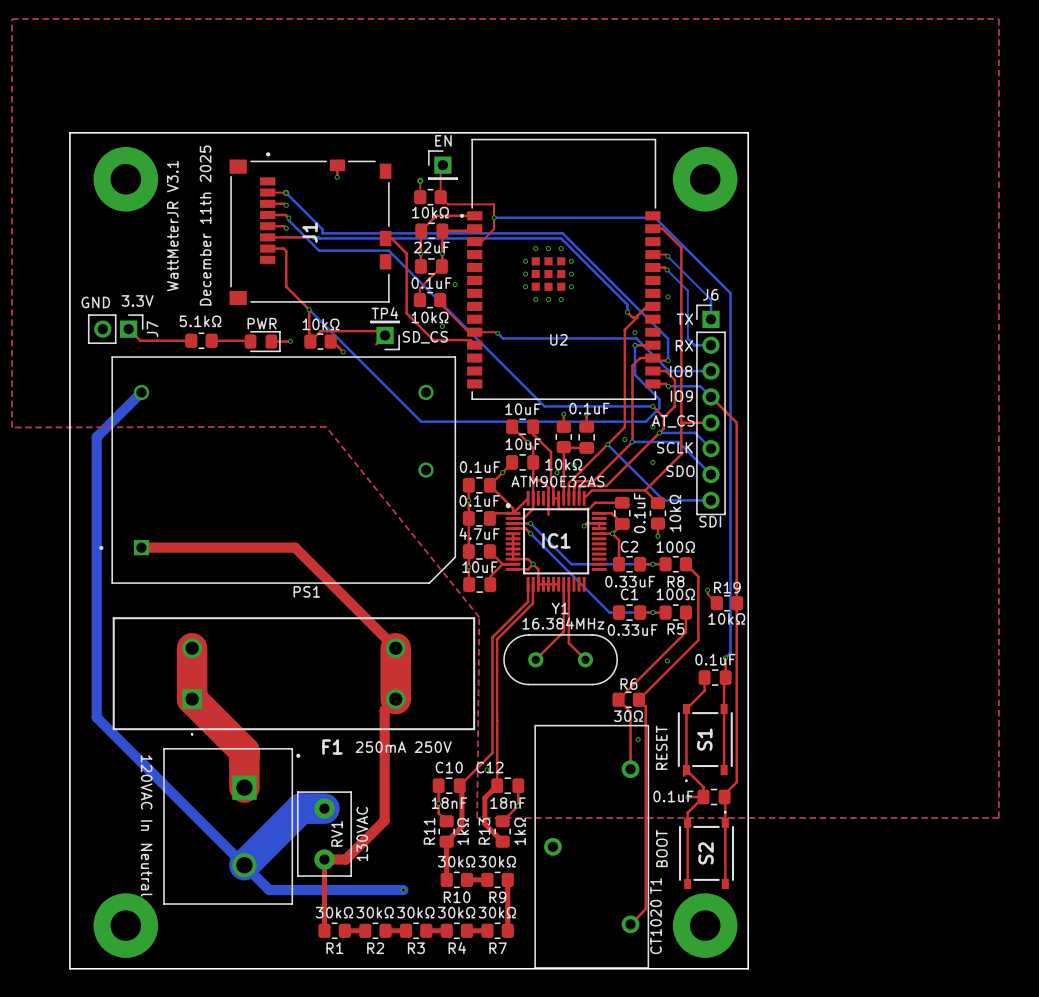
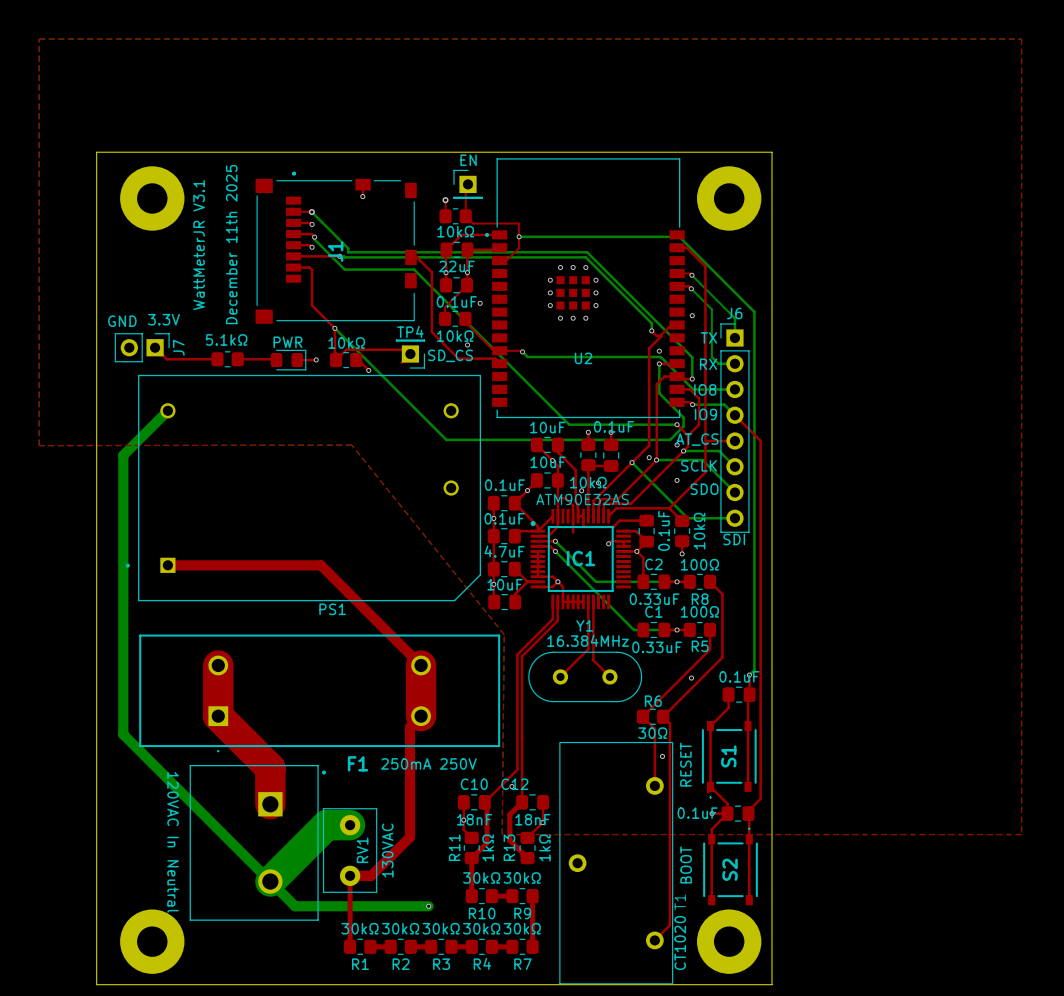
top track: (707, 590) (707, 594) (716, 603) -> none
via: (707, 590) -> none
R19: 10kΩ (726, 603) -> none

